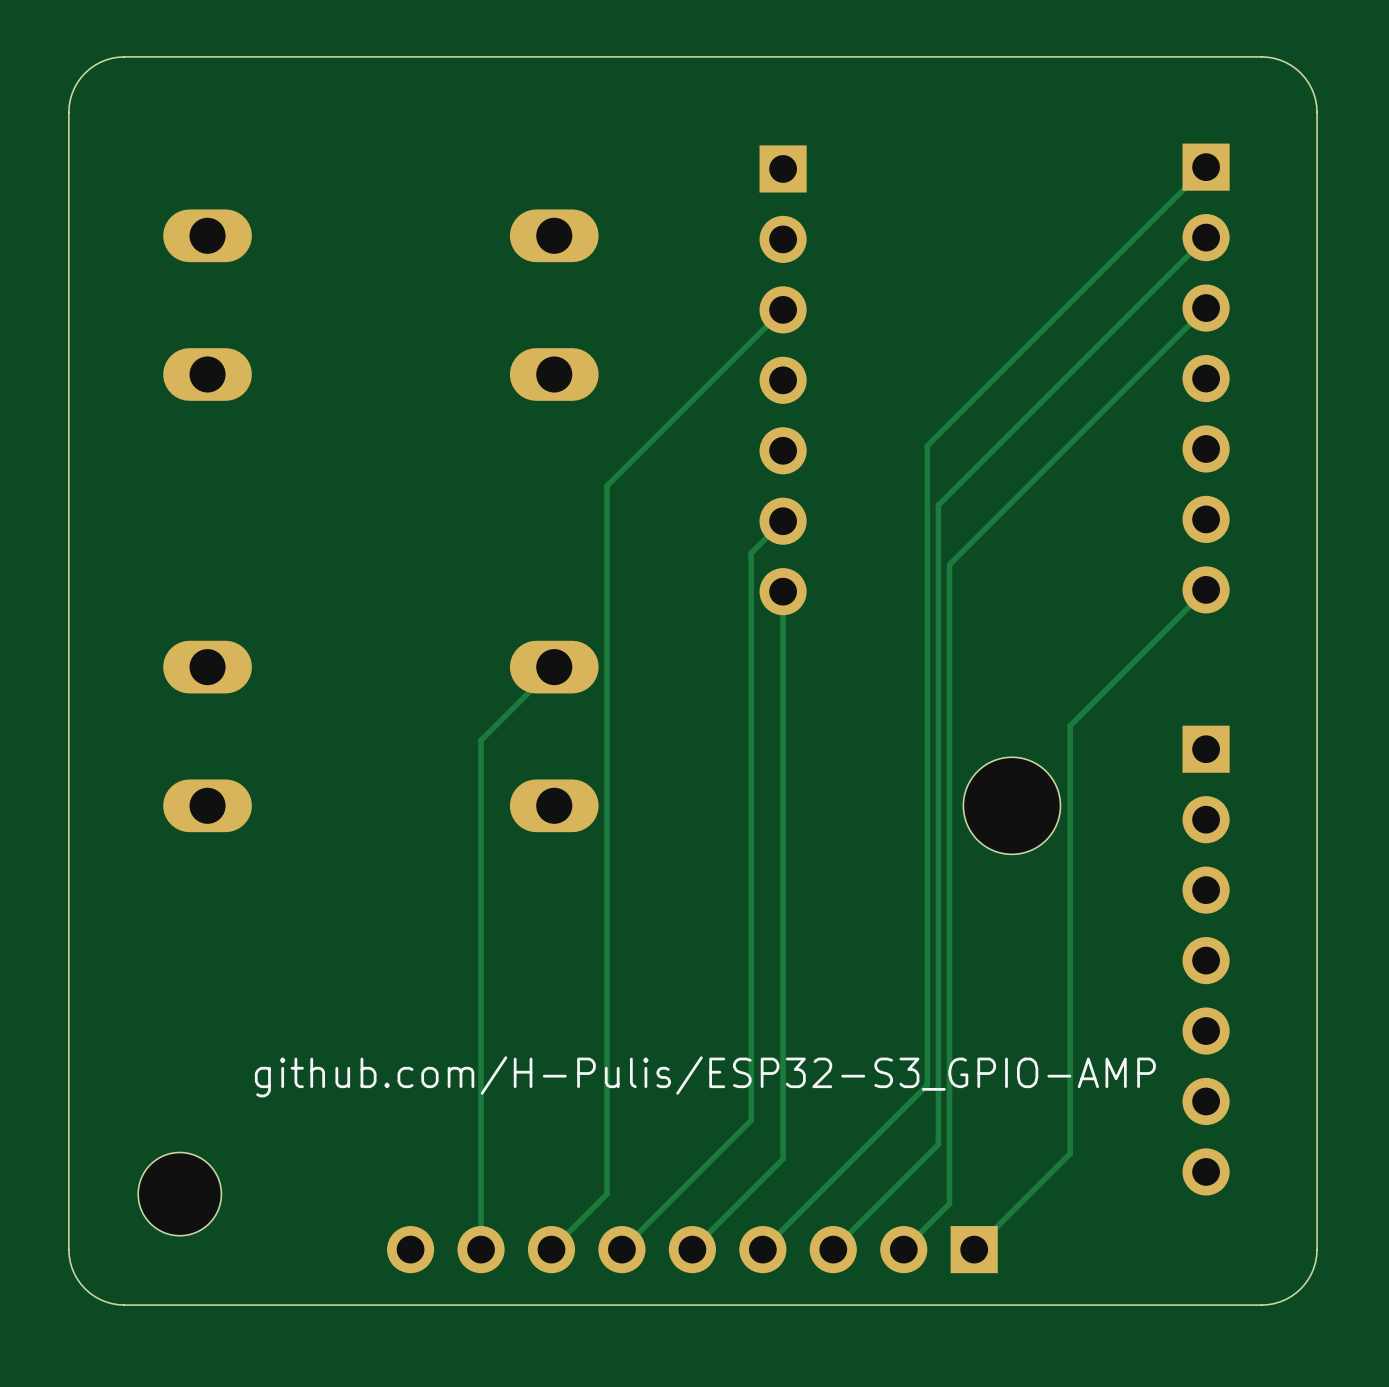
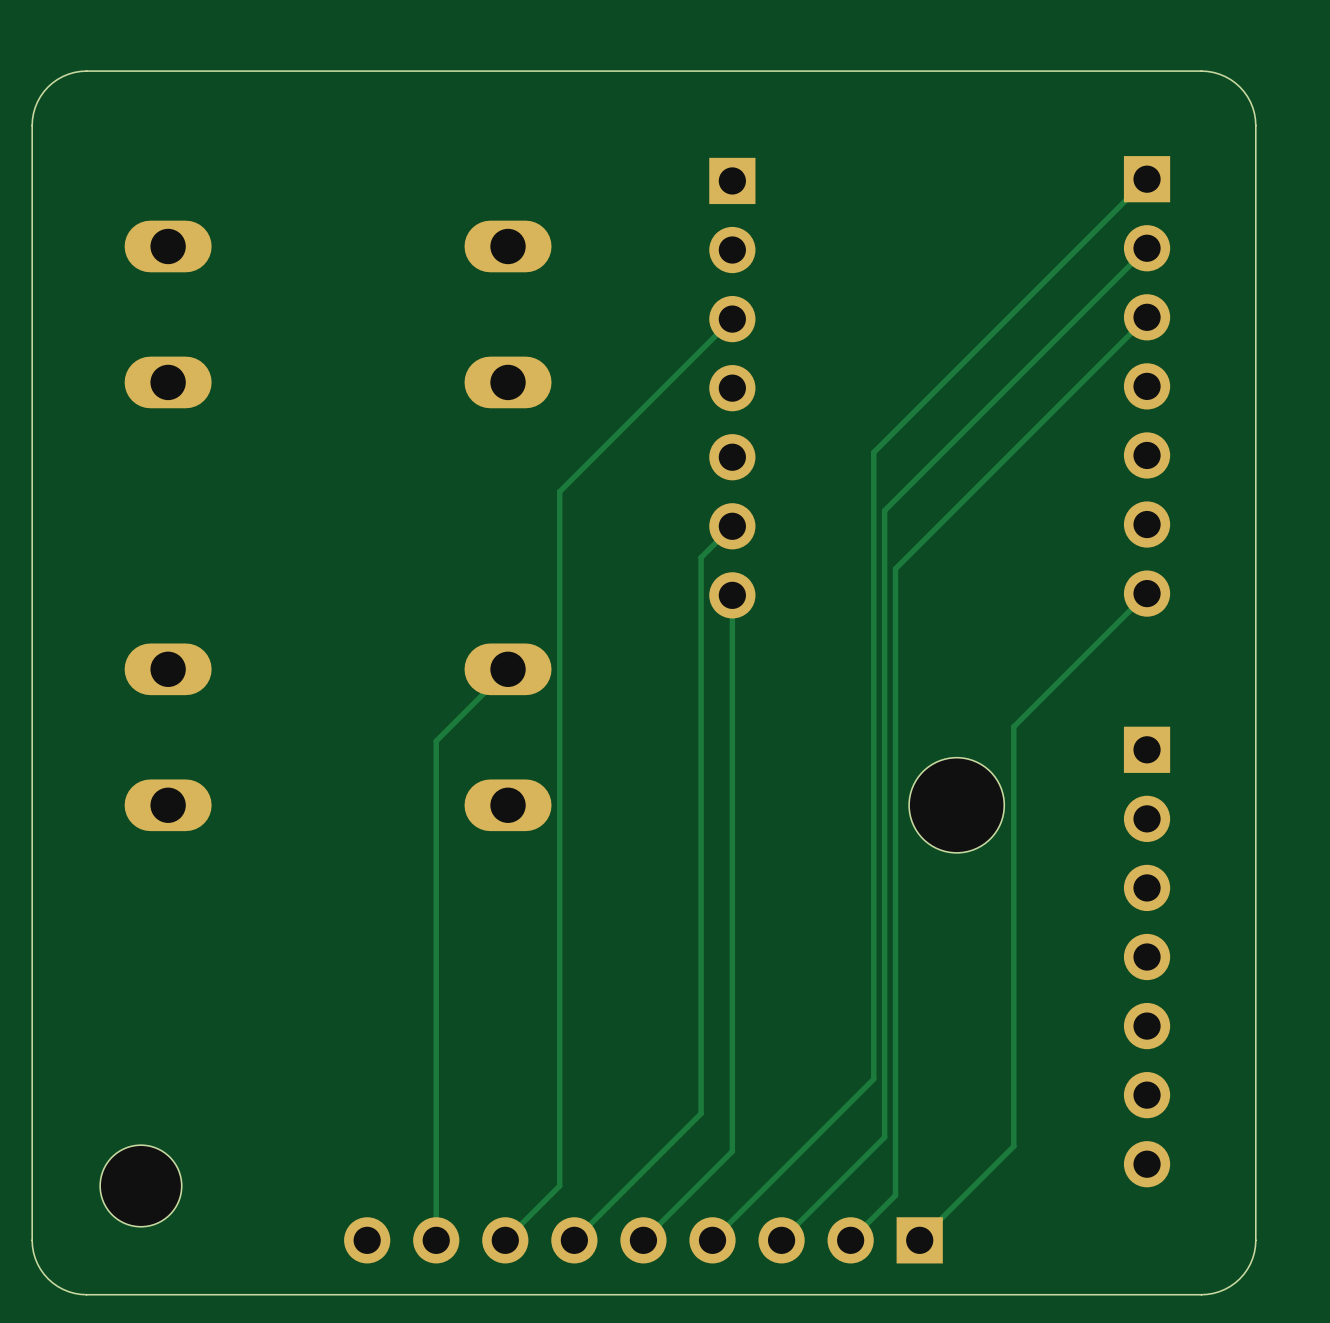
text: github.com/H-Pulis/ESP32-S3_GPIO-AMP (705, 1076) -> none

